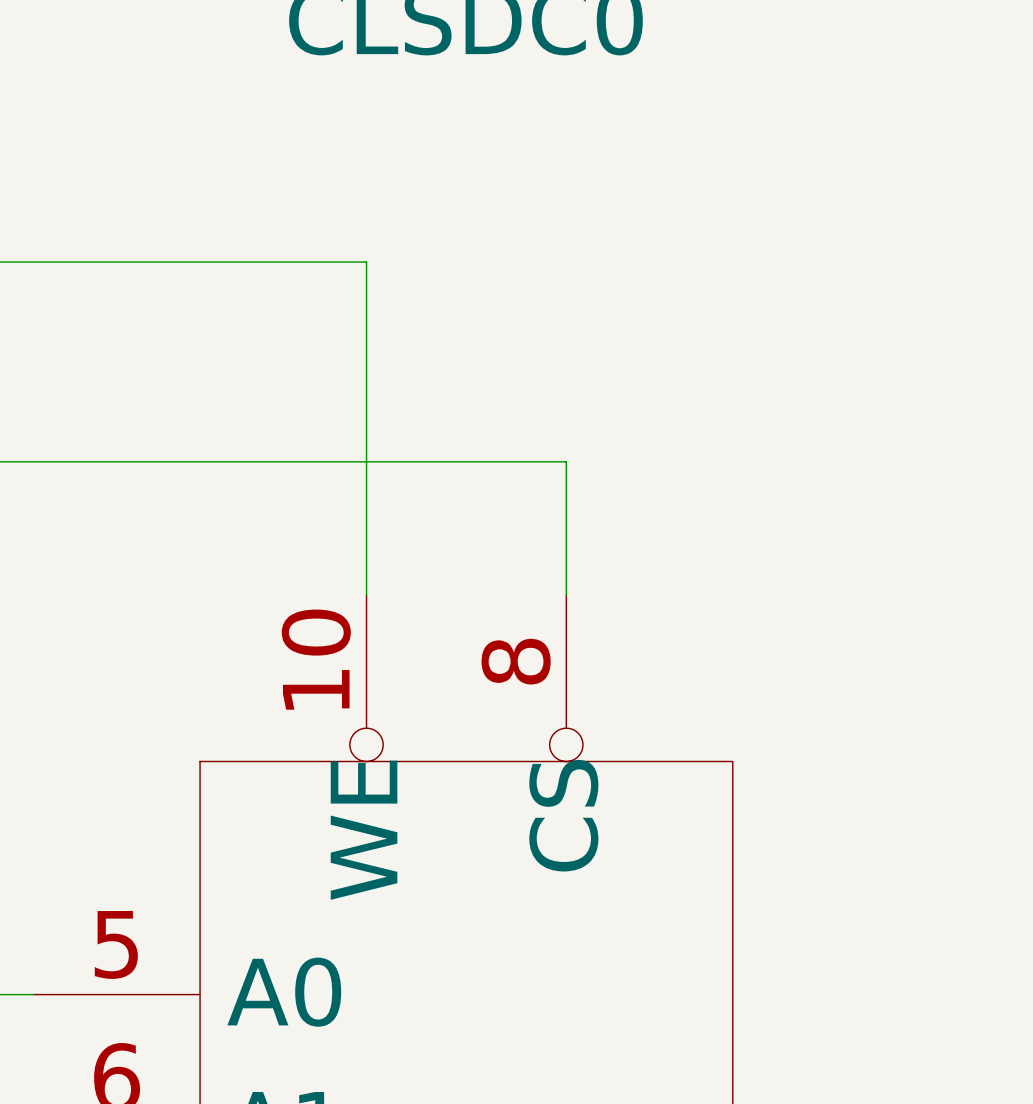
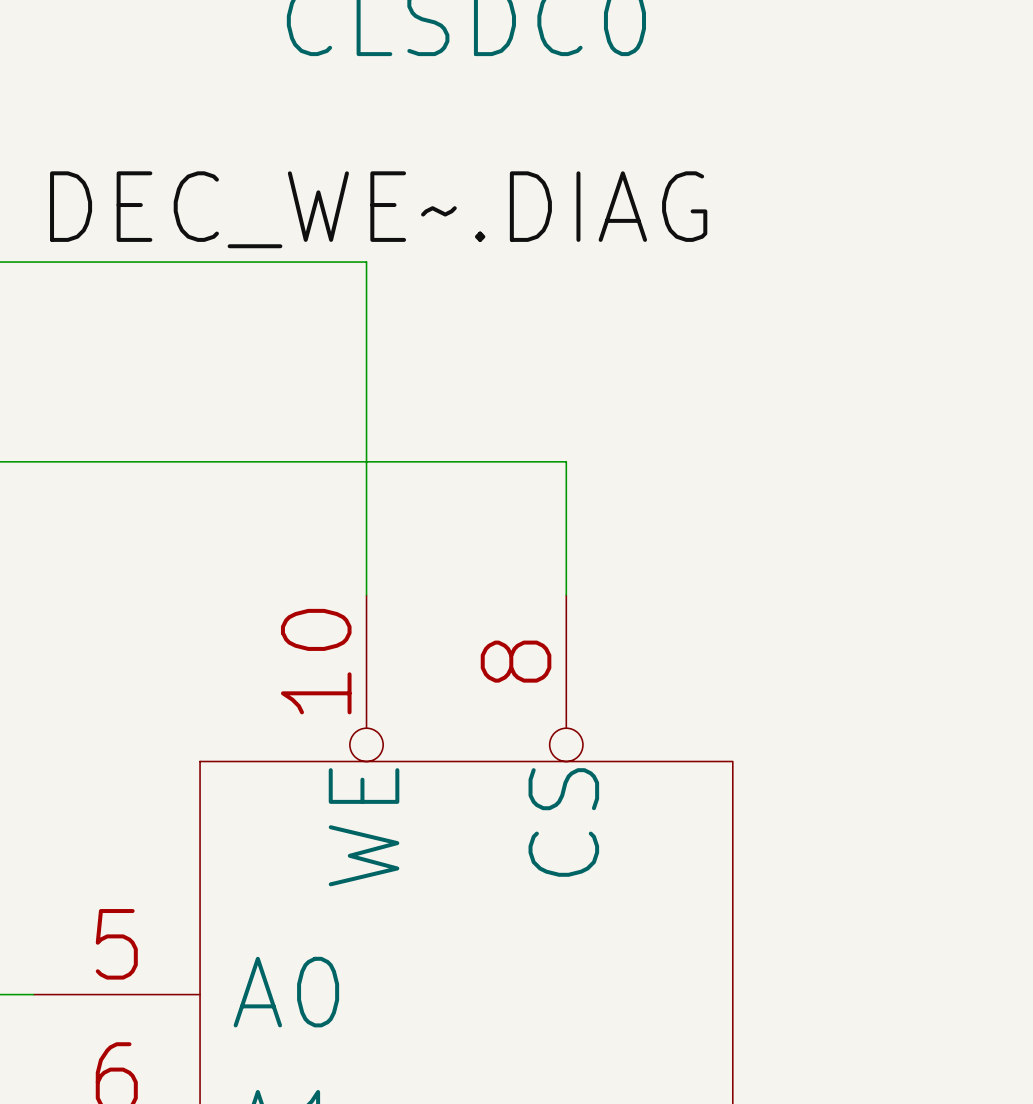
label: none -> DEC_WE~.DIAG (378, 209)

